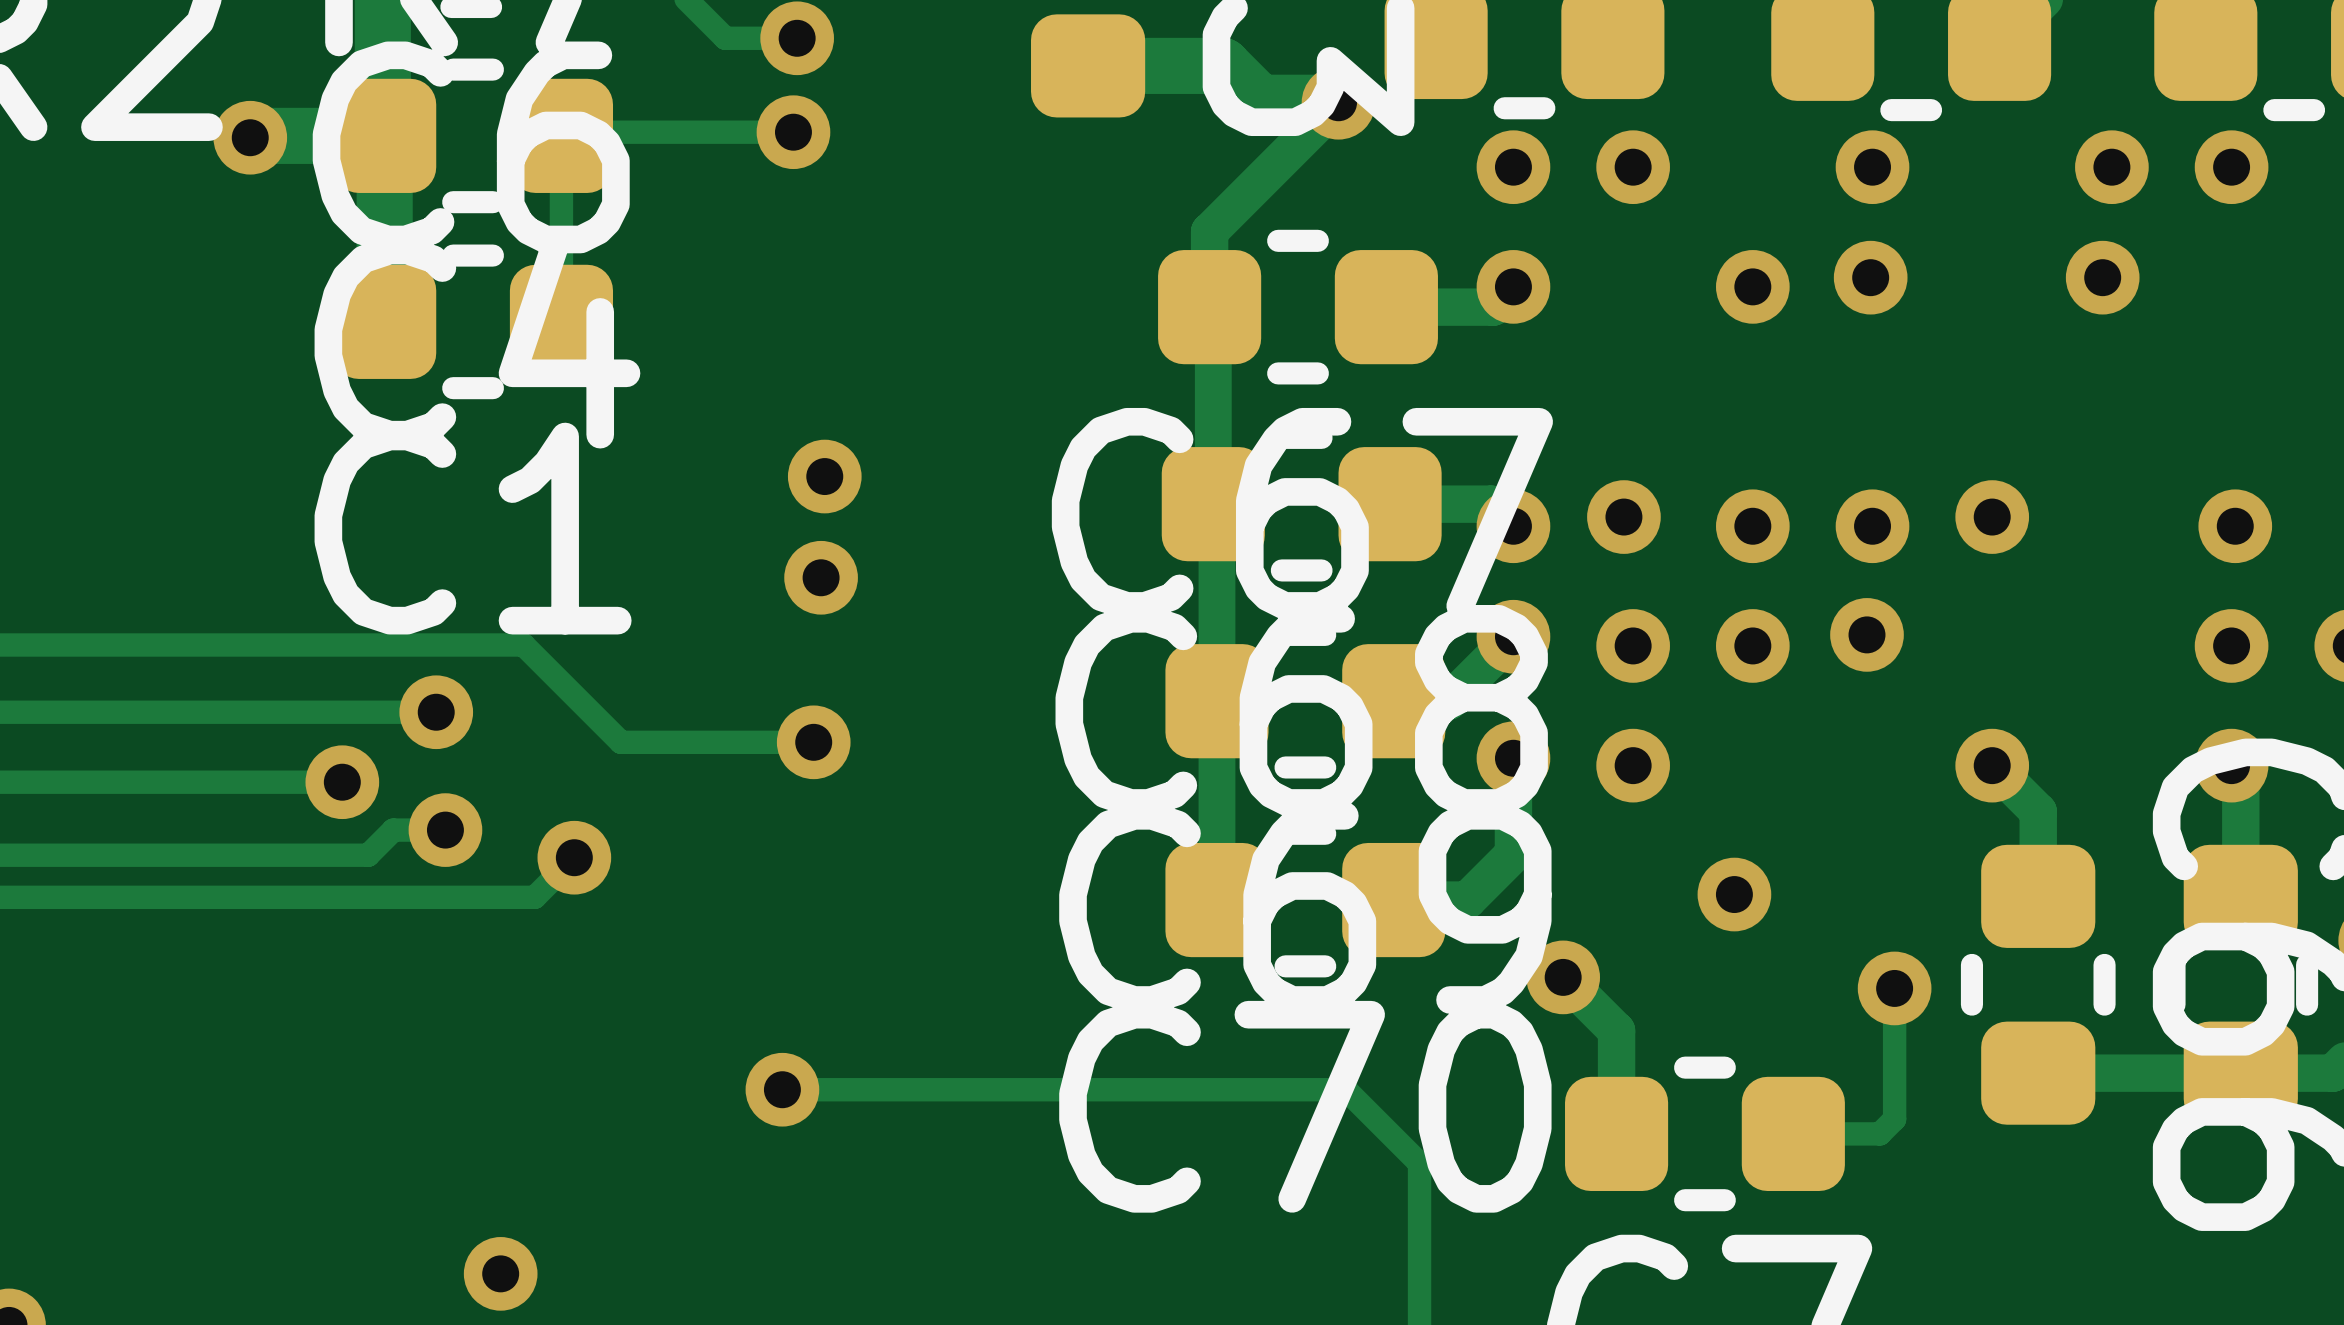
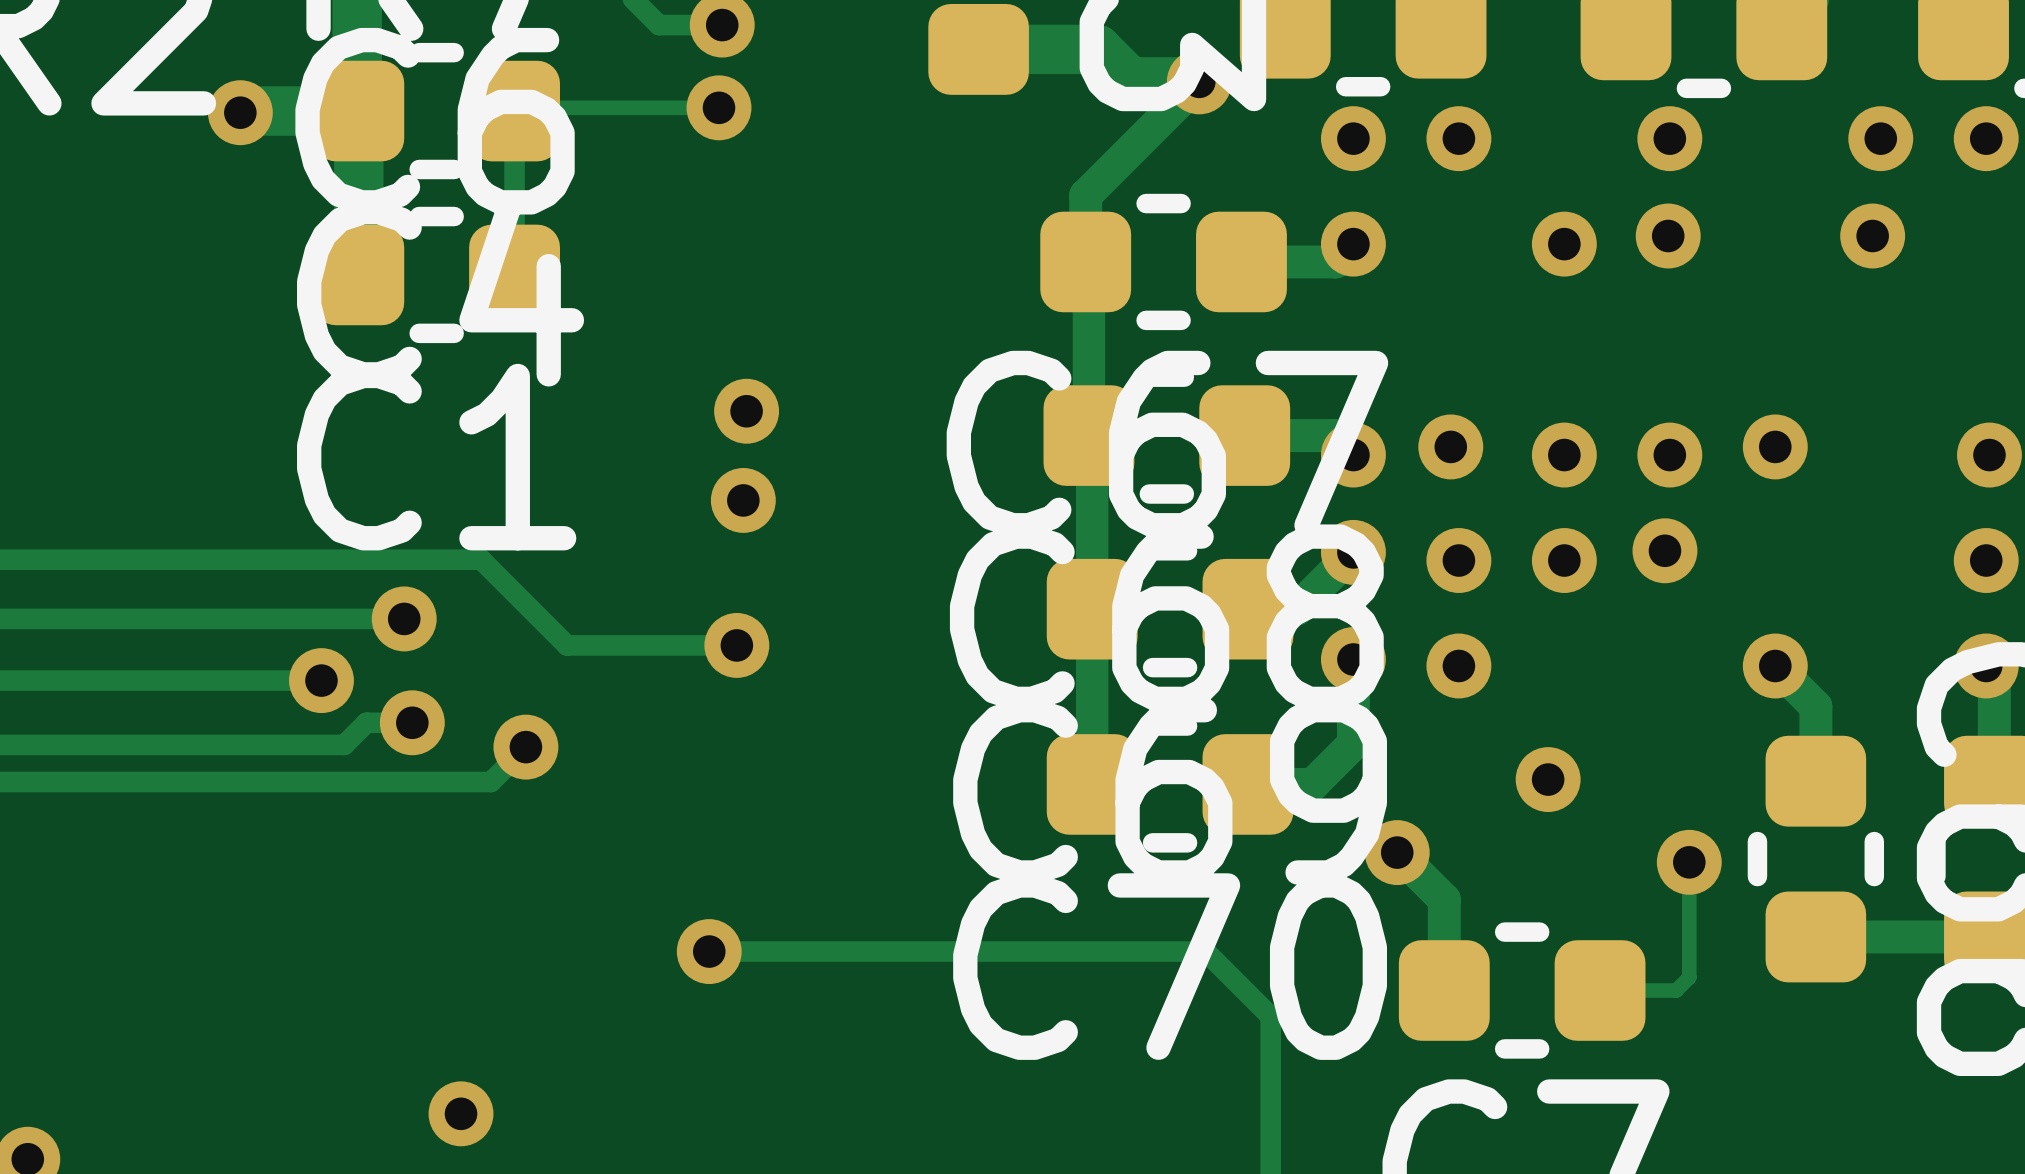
track width: thick (793, 132) (565, 132) -> thin (719, 107) (517, 107)
track width: thick (1894, 988) (1894, 1119) (1879, 1133) (1793, 1133) -> thin (1689, 862) (1689, 977) (1676, 990) (1600, 990)

